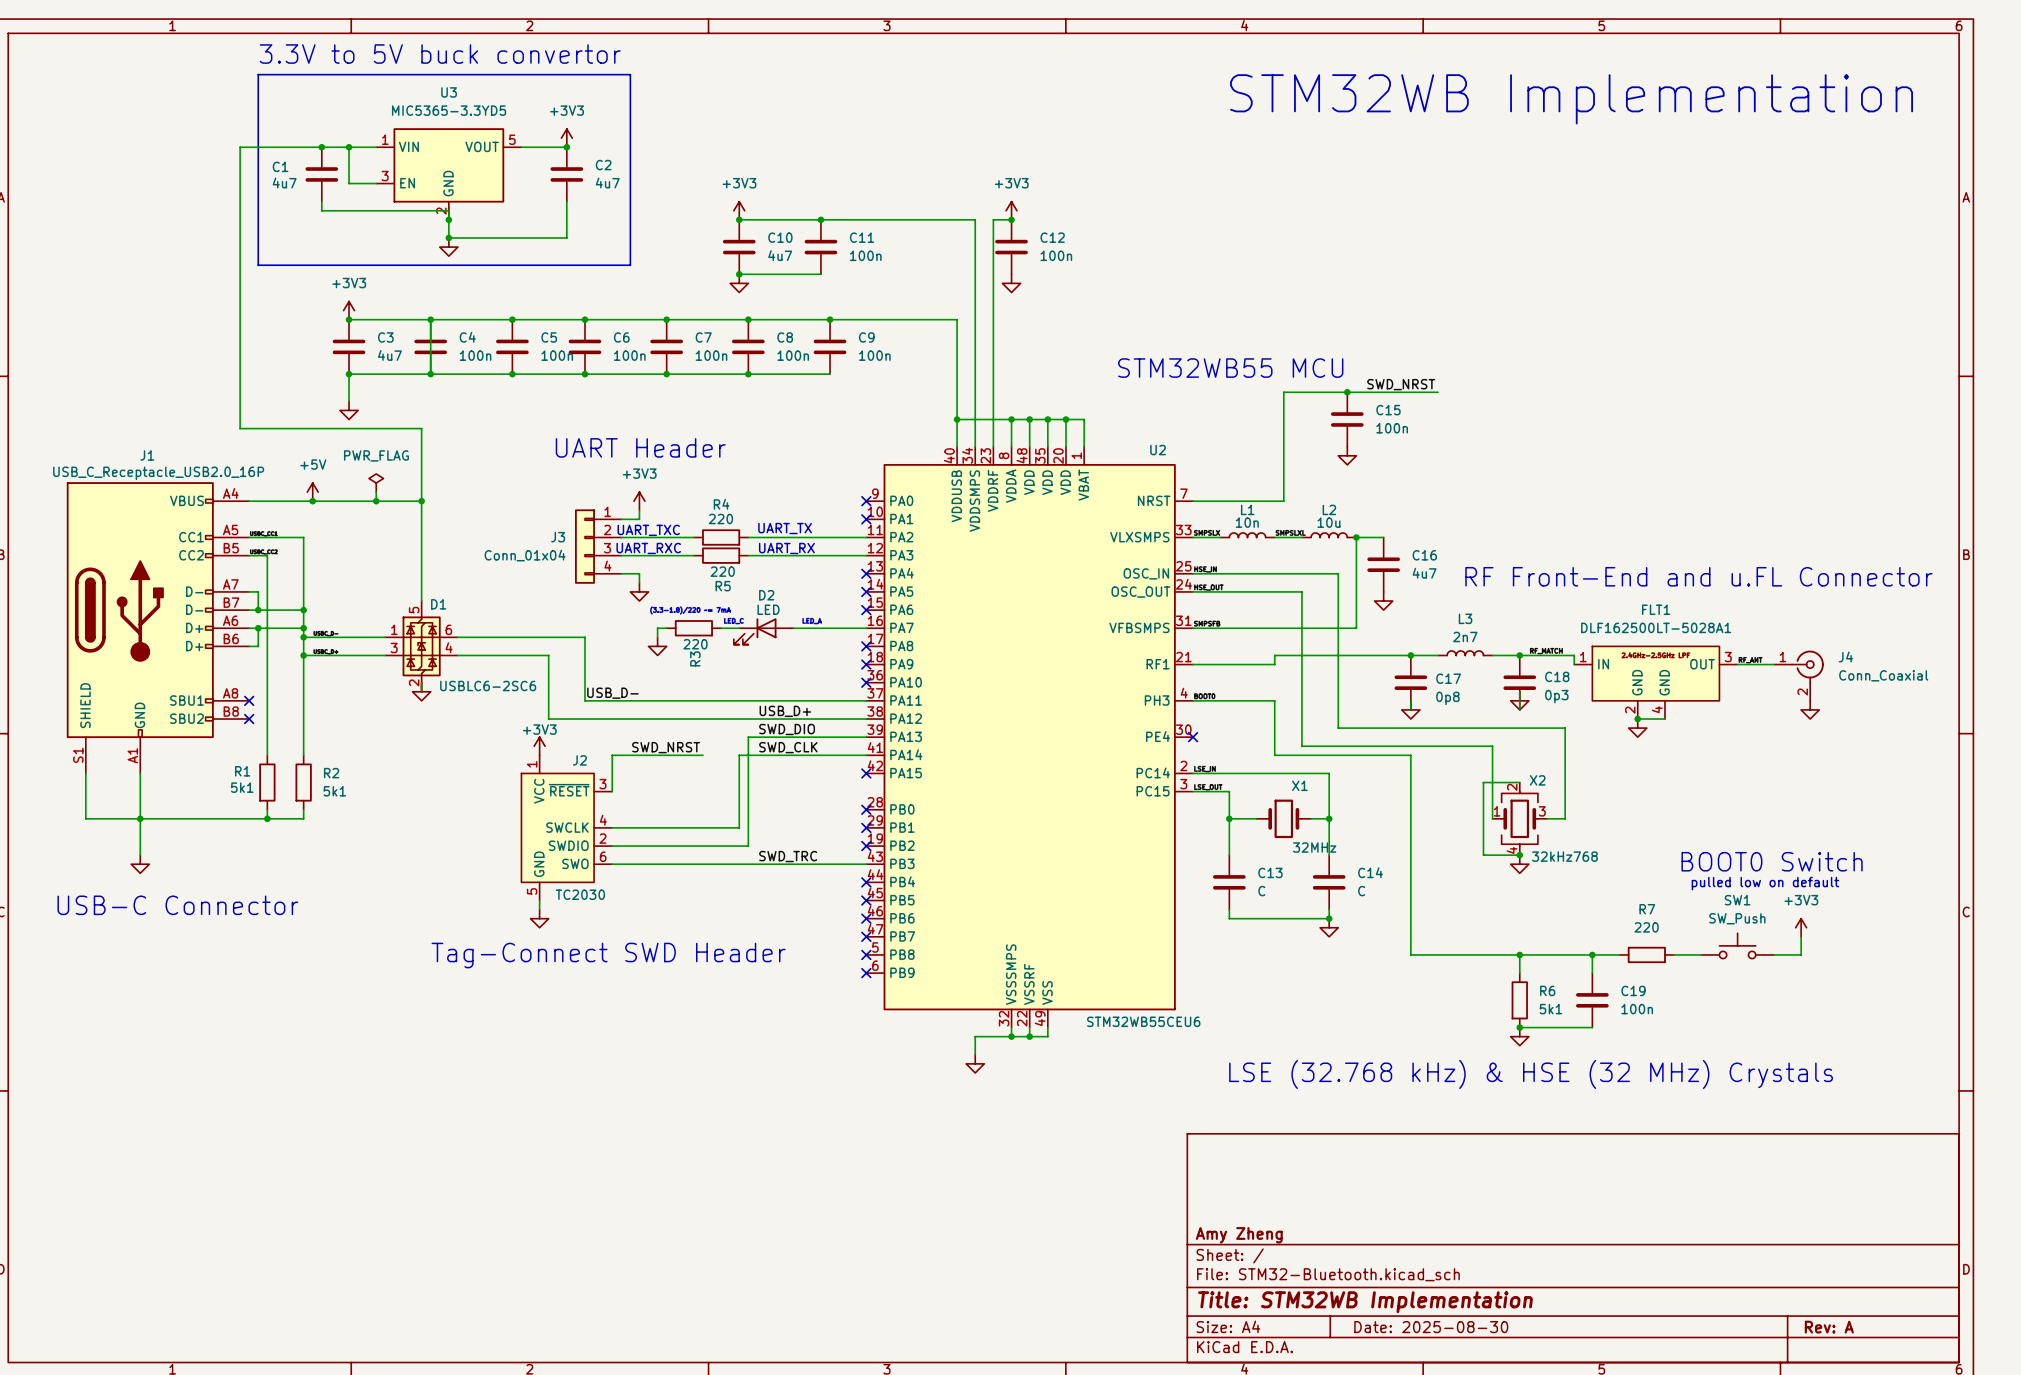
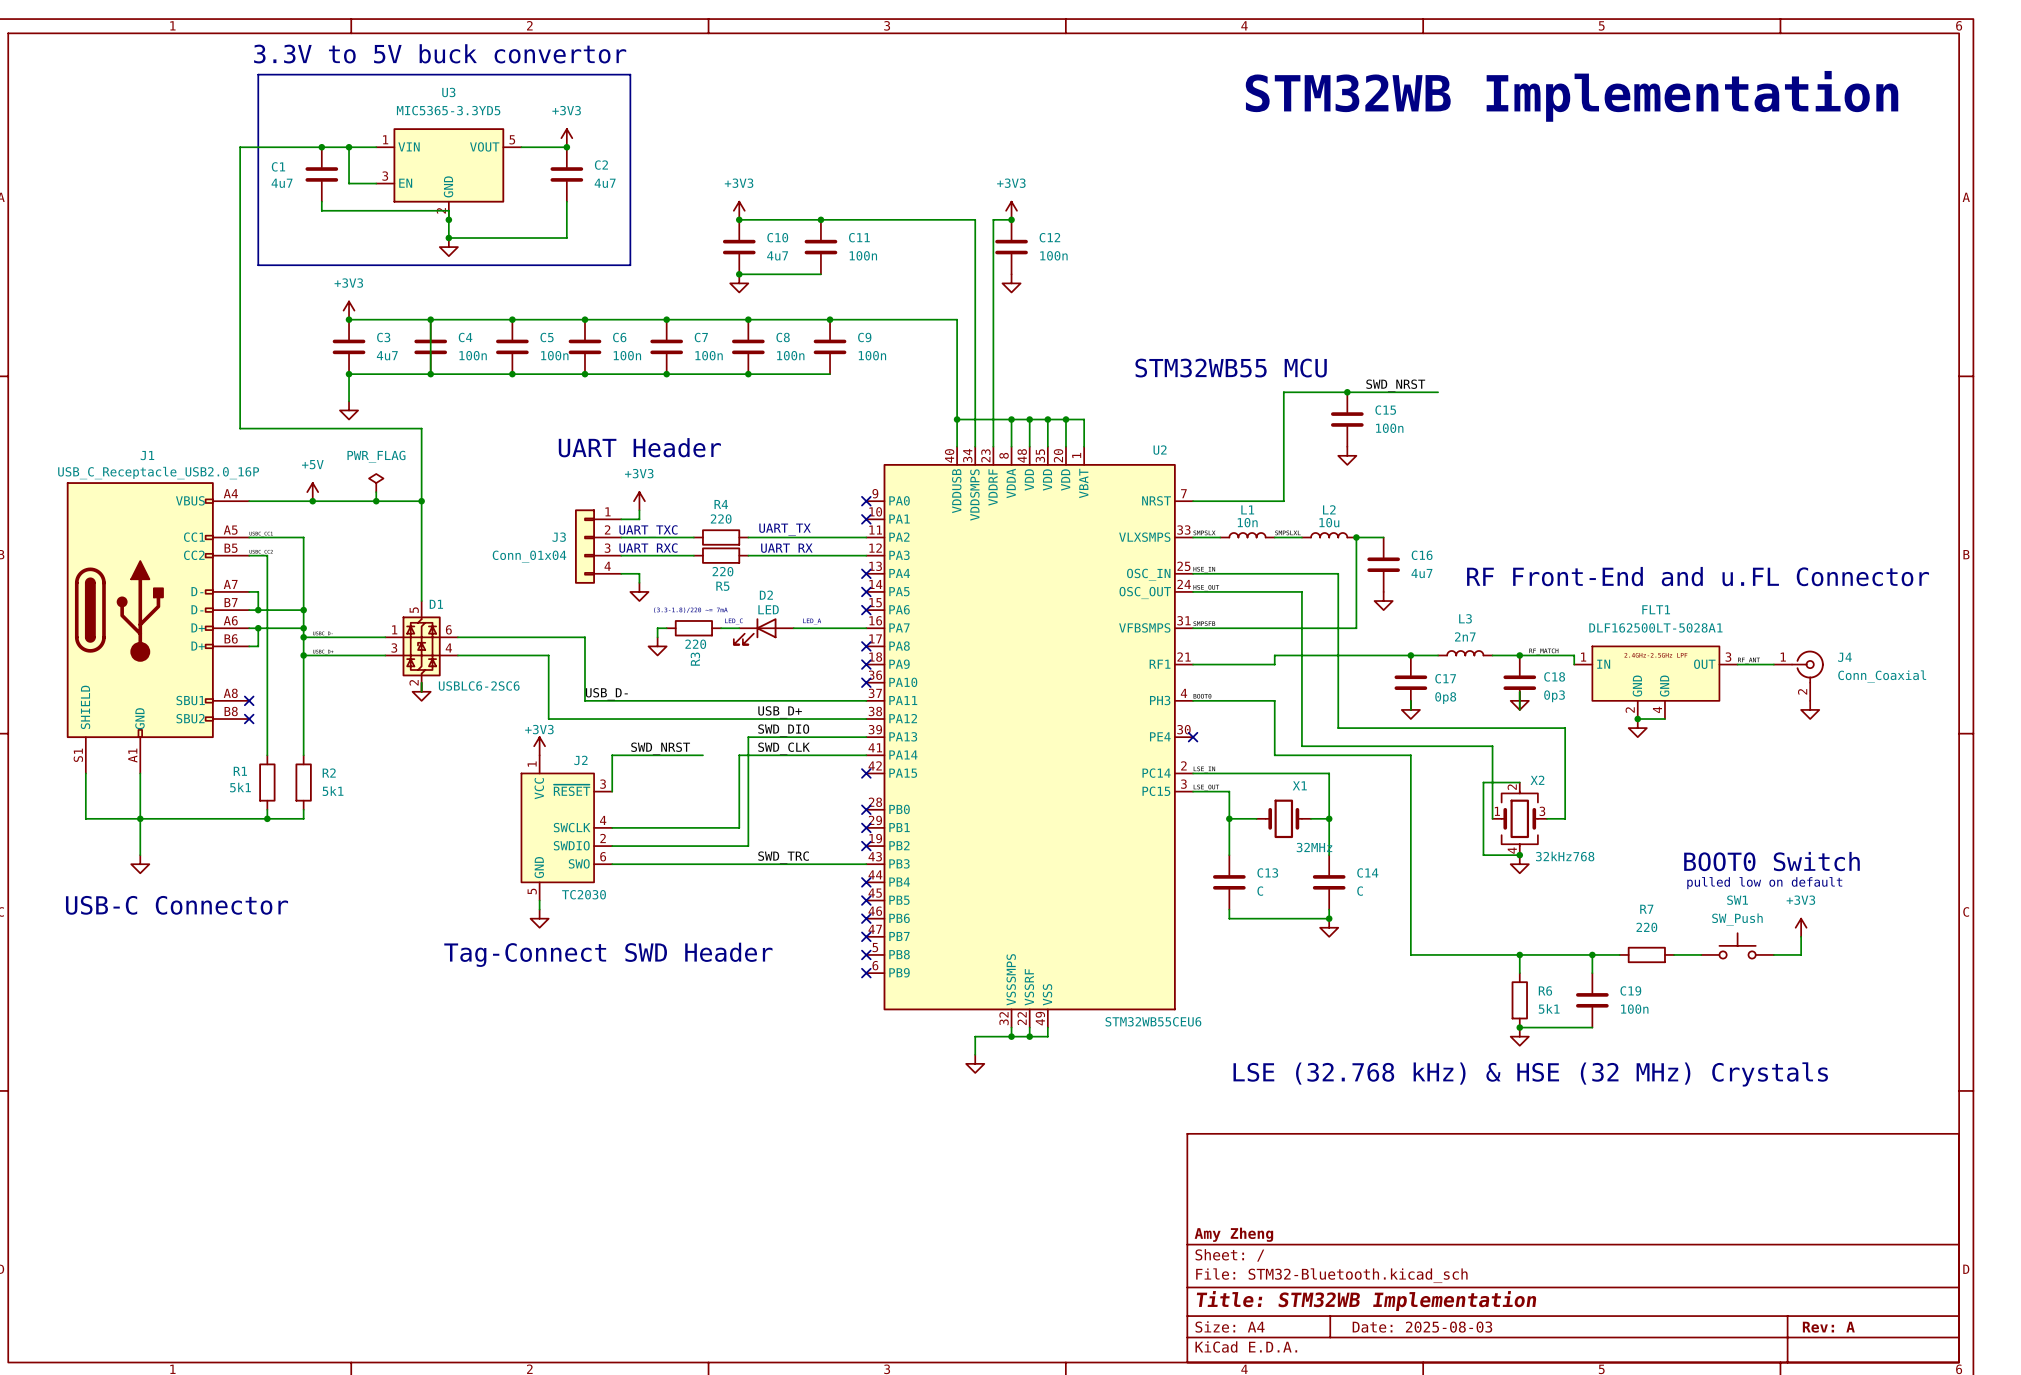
title block: Date: 2025-08-30 (1431, 1327) -> Date: 2025-08-03 (1422, 1327)

